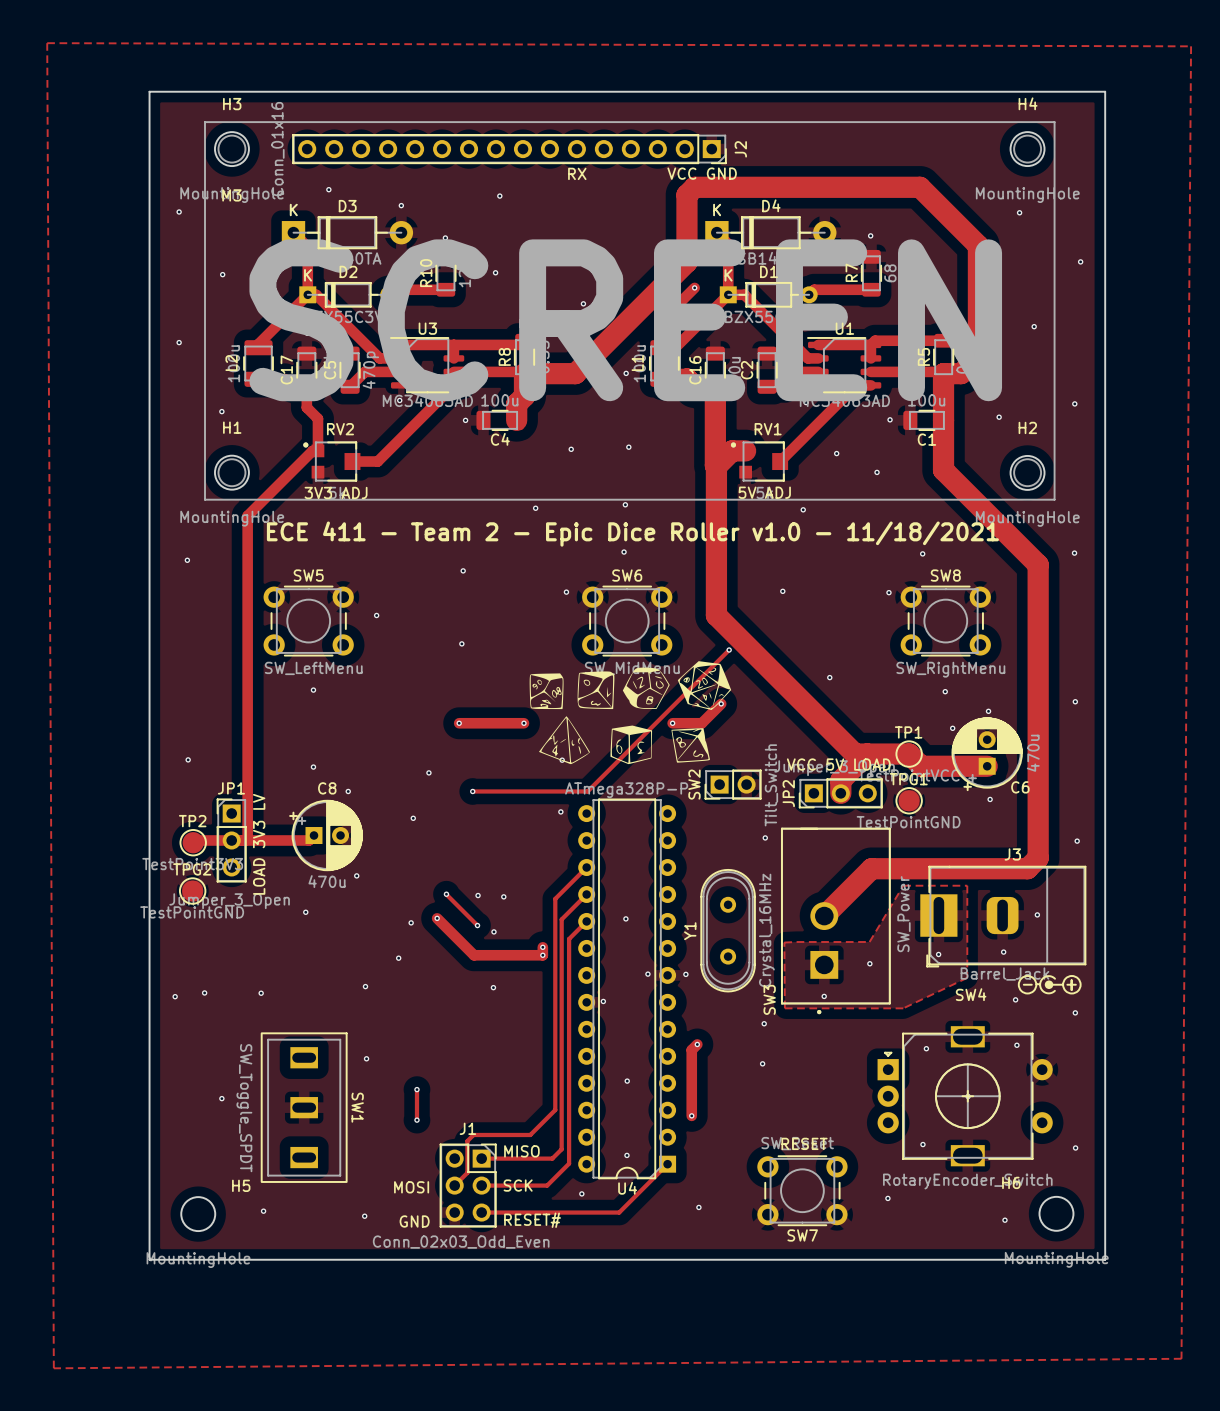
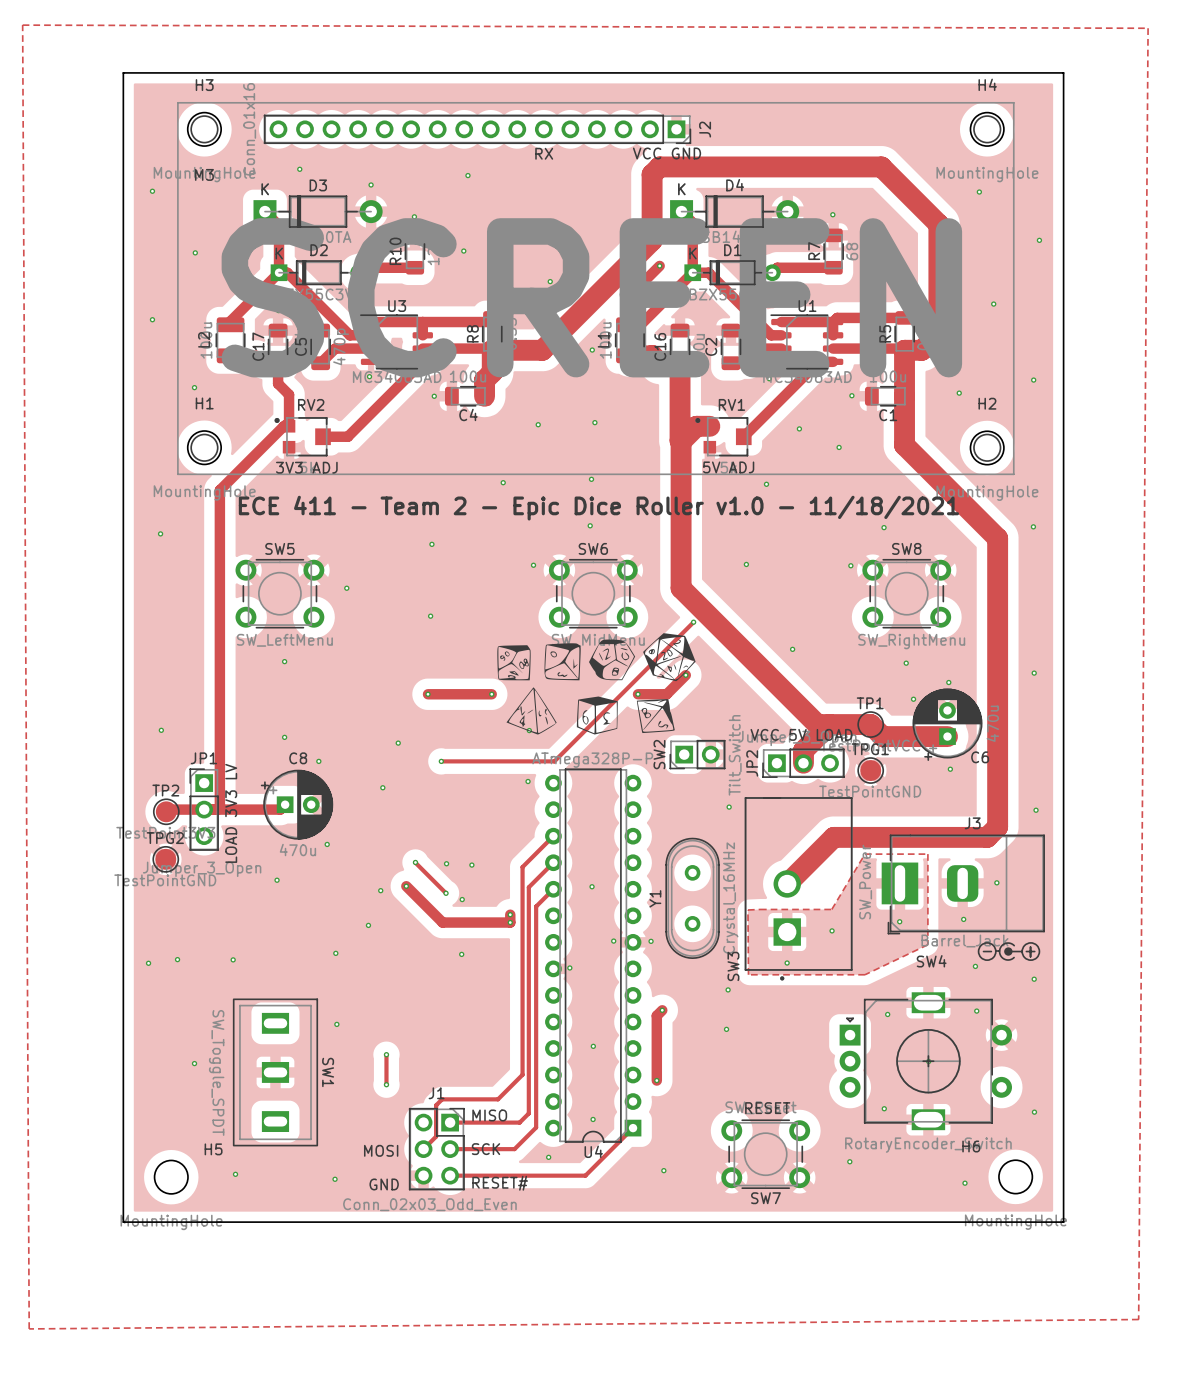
J2 footprint: [204, 121, 1056, 501] -> [177, 102, 1015, 475]

